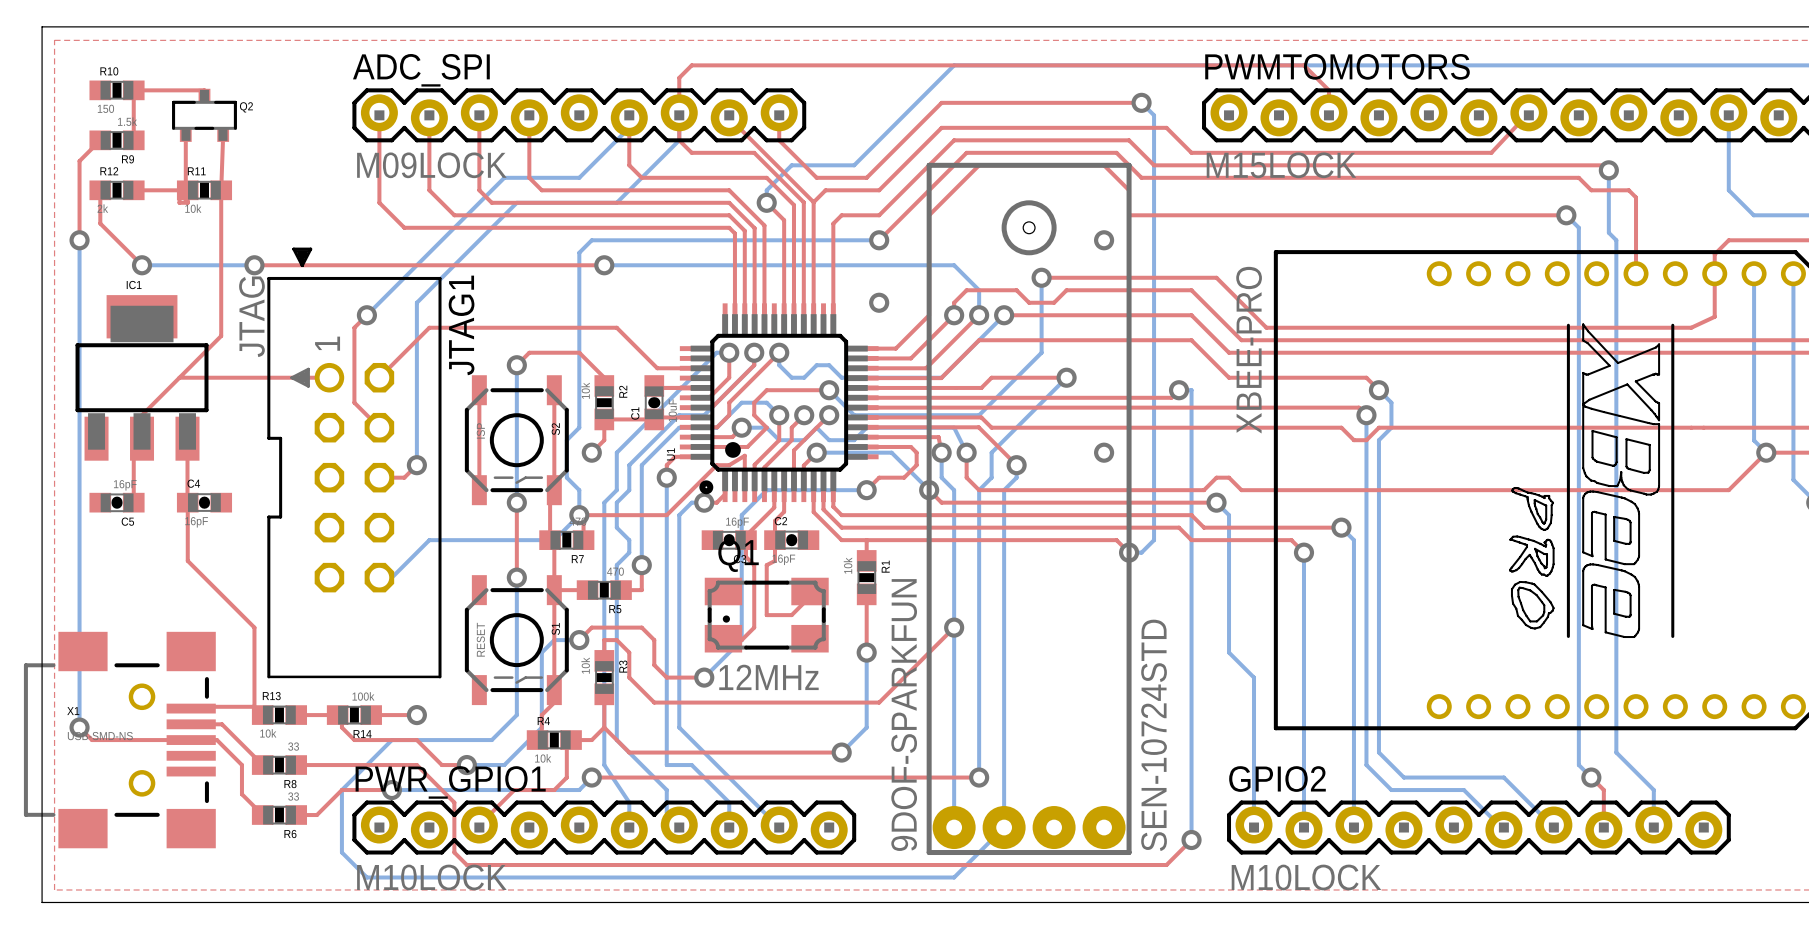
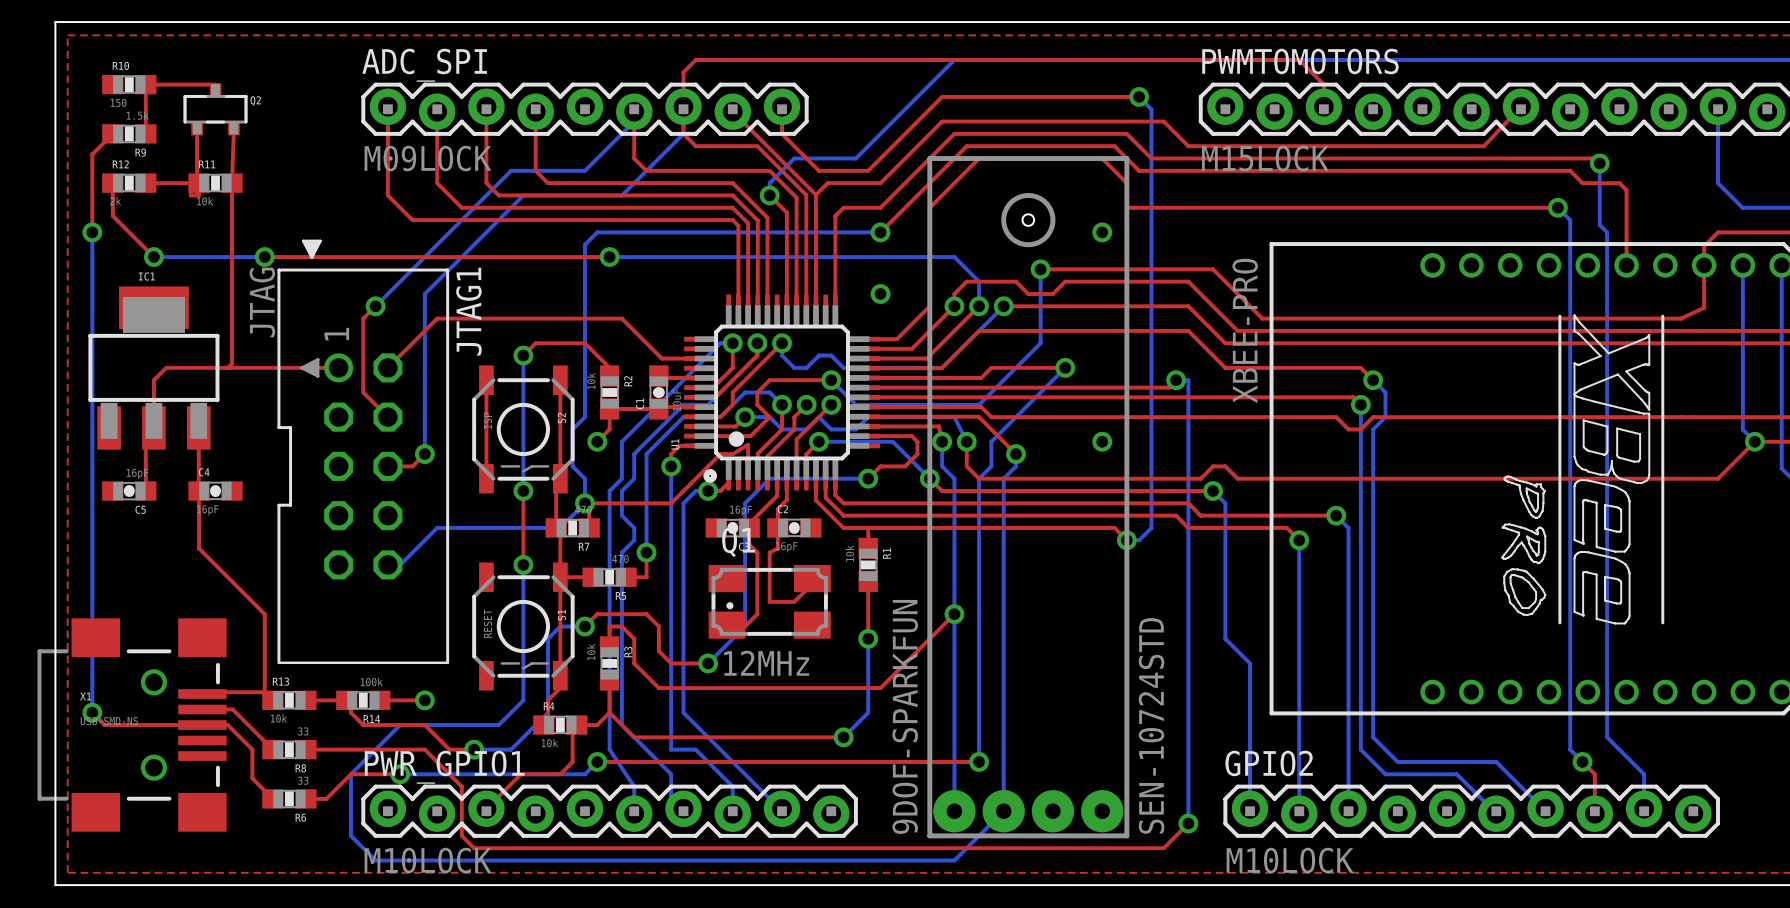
top track: (221, 336) (142, 415) -> (190, 367) (166, 367) (153, 380) (153, 404)
top track: none -> (232, 326) (232, 363) (227, 367)

